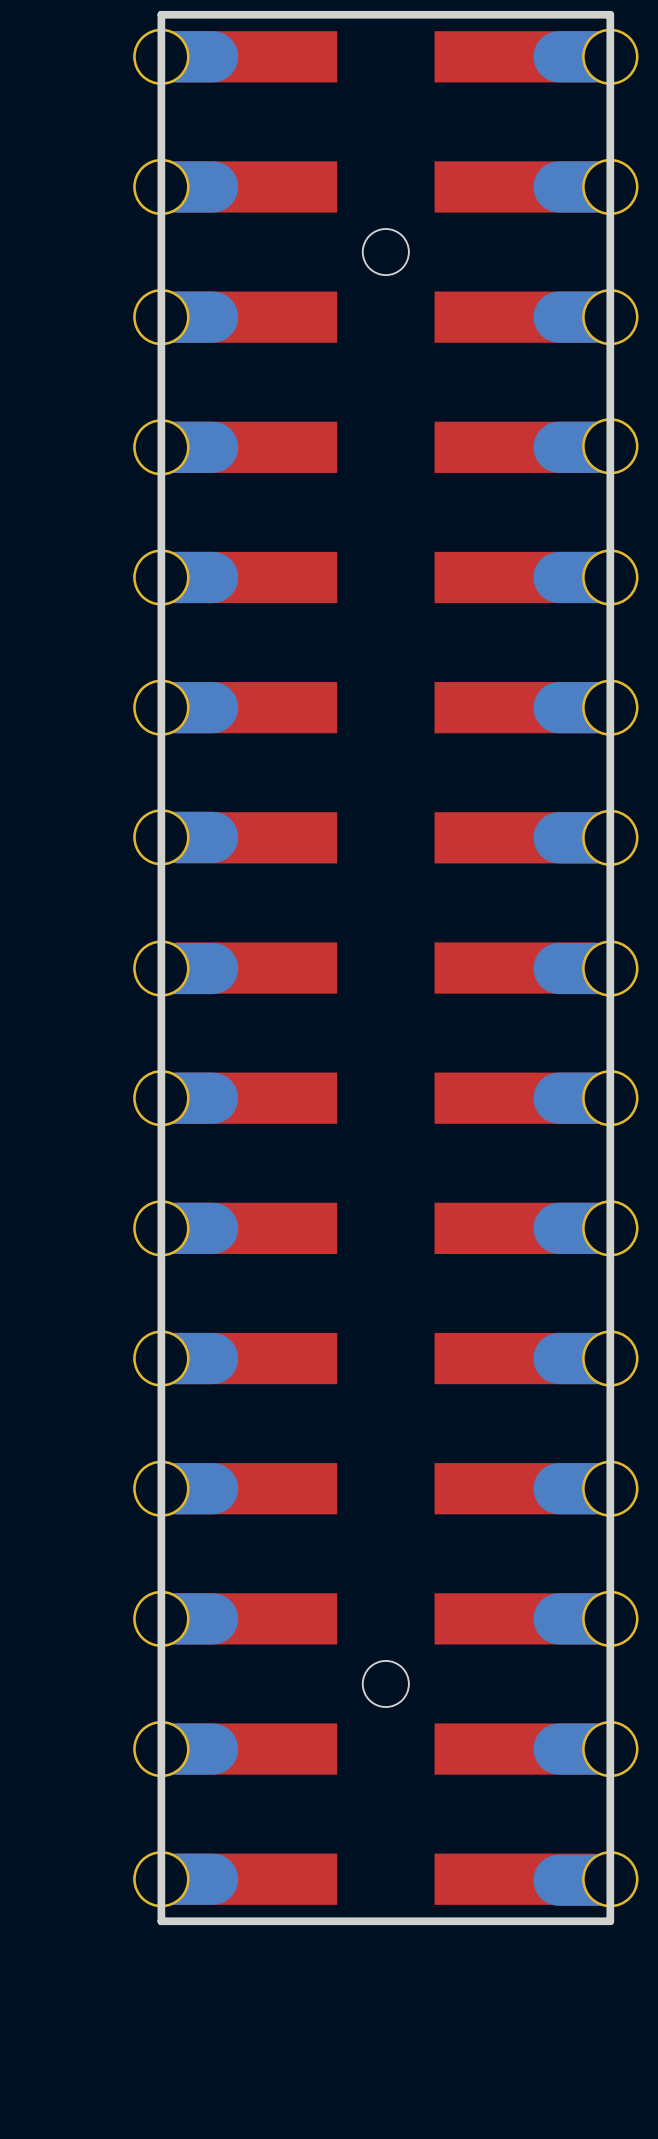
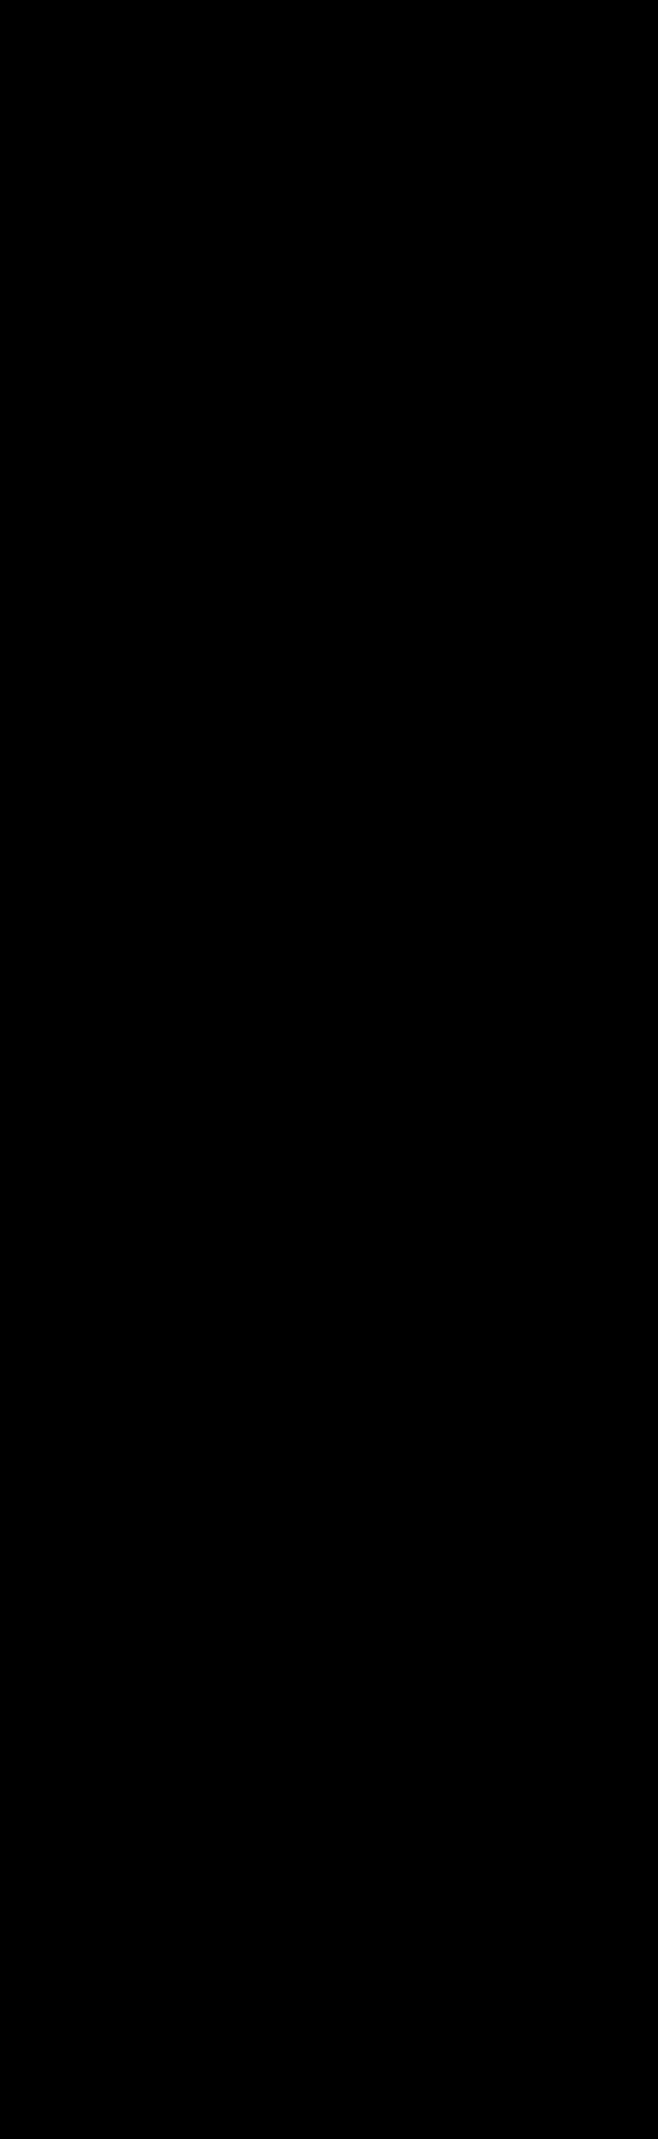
part: (385, 968) -> none

